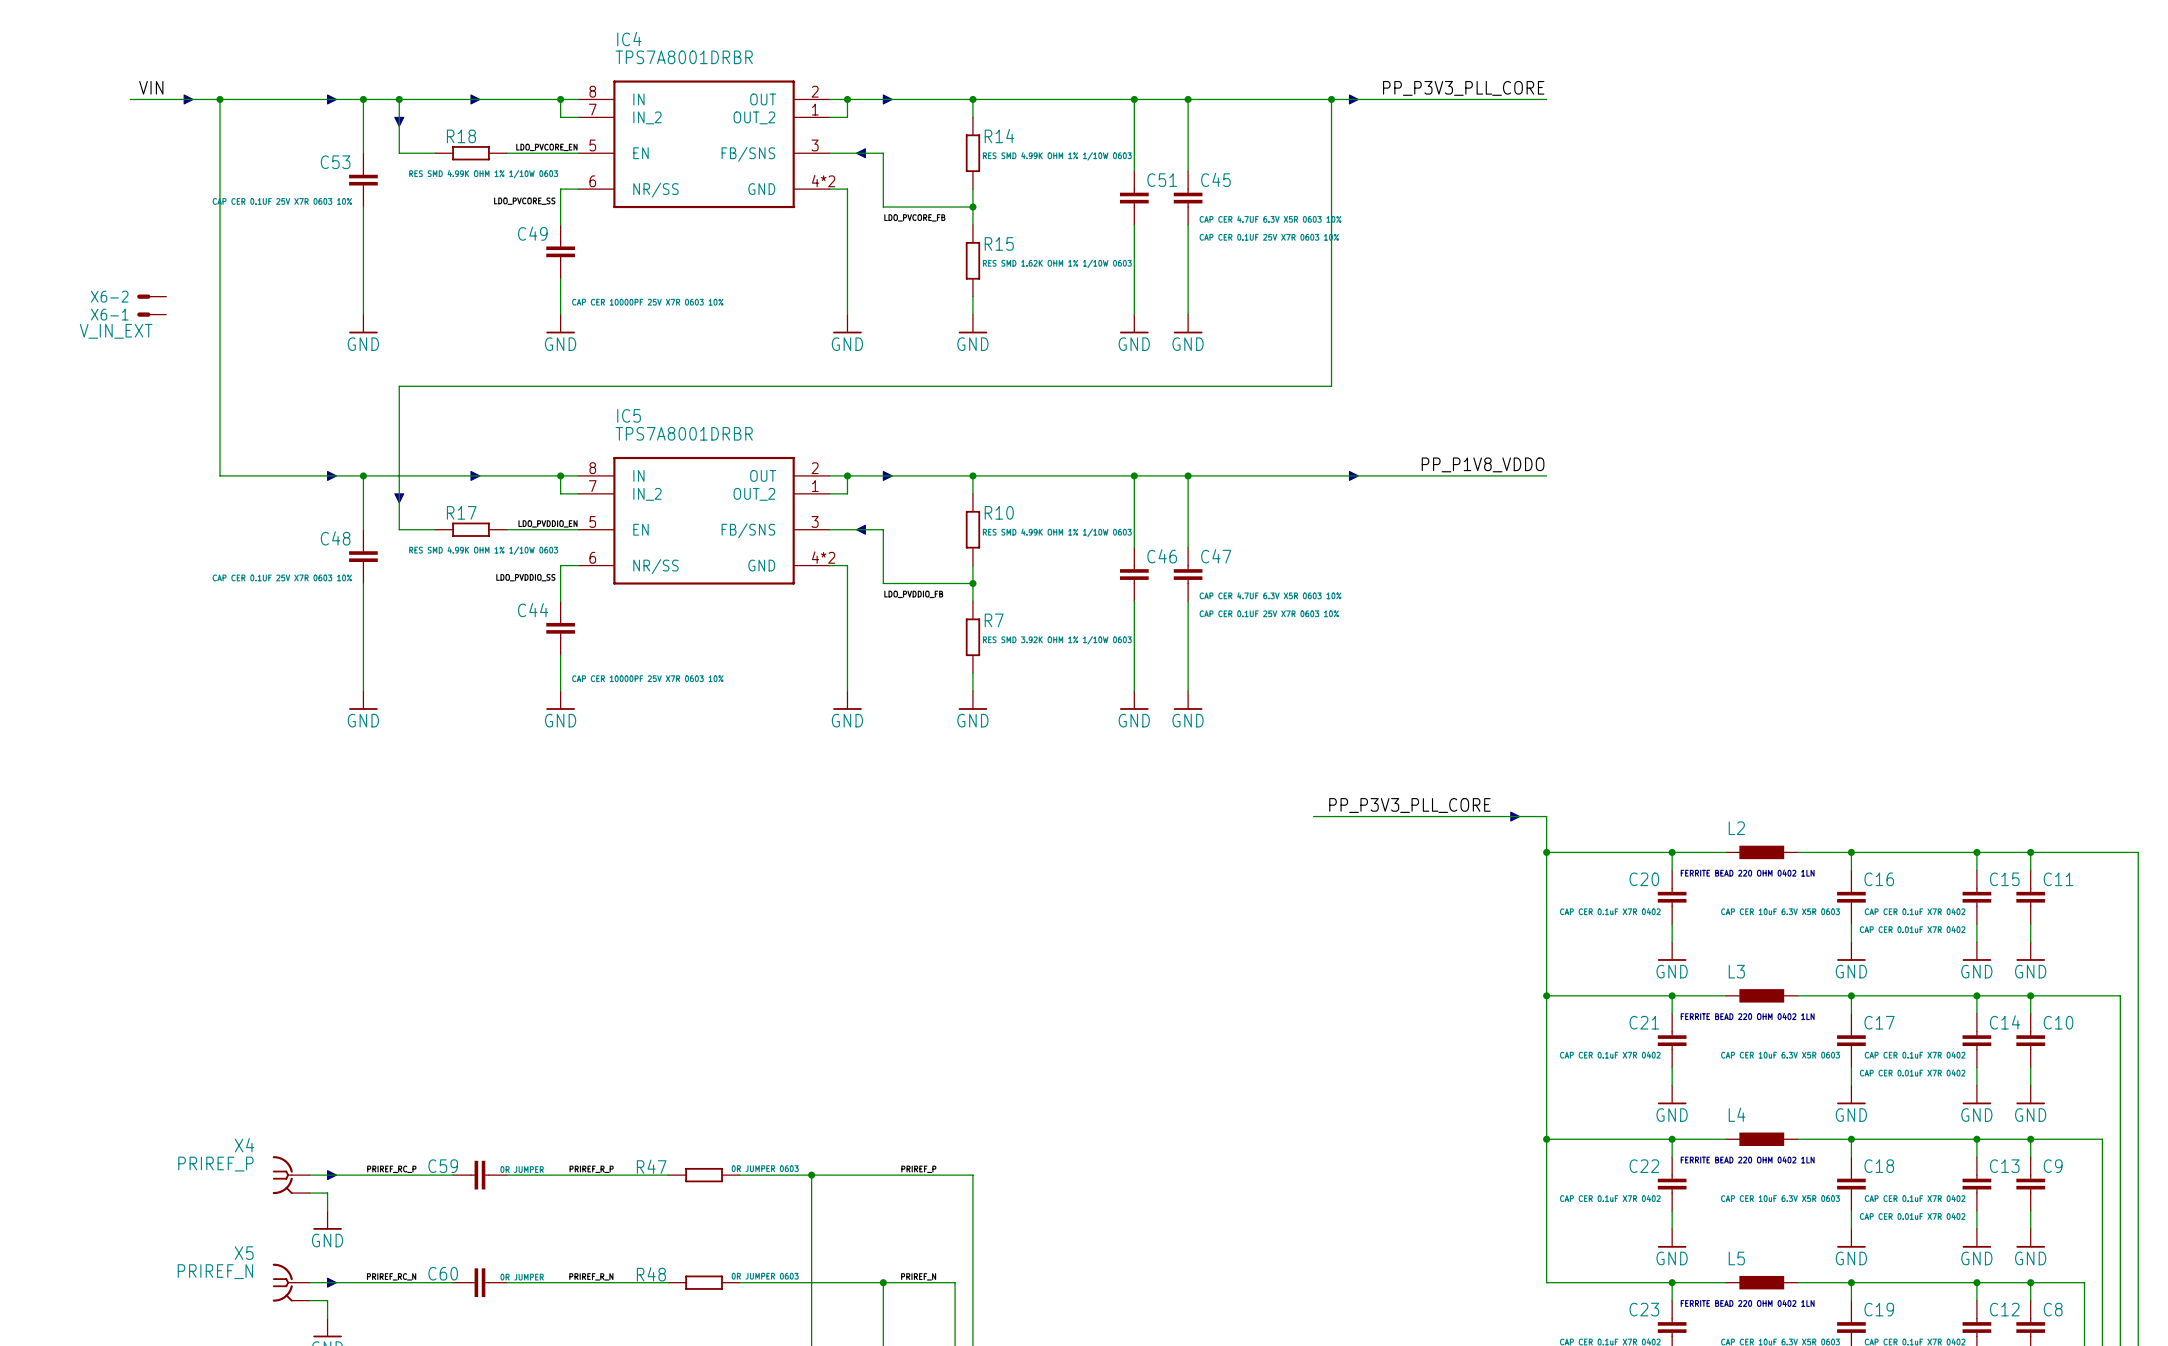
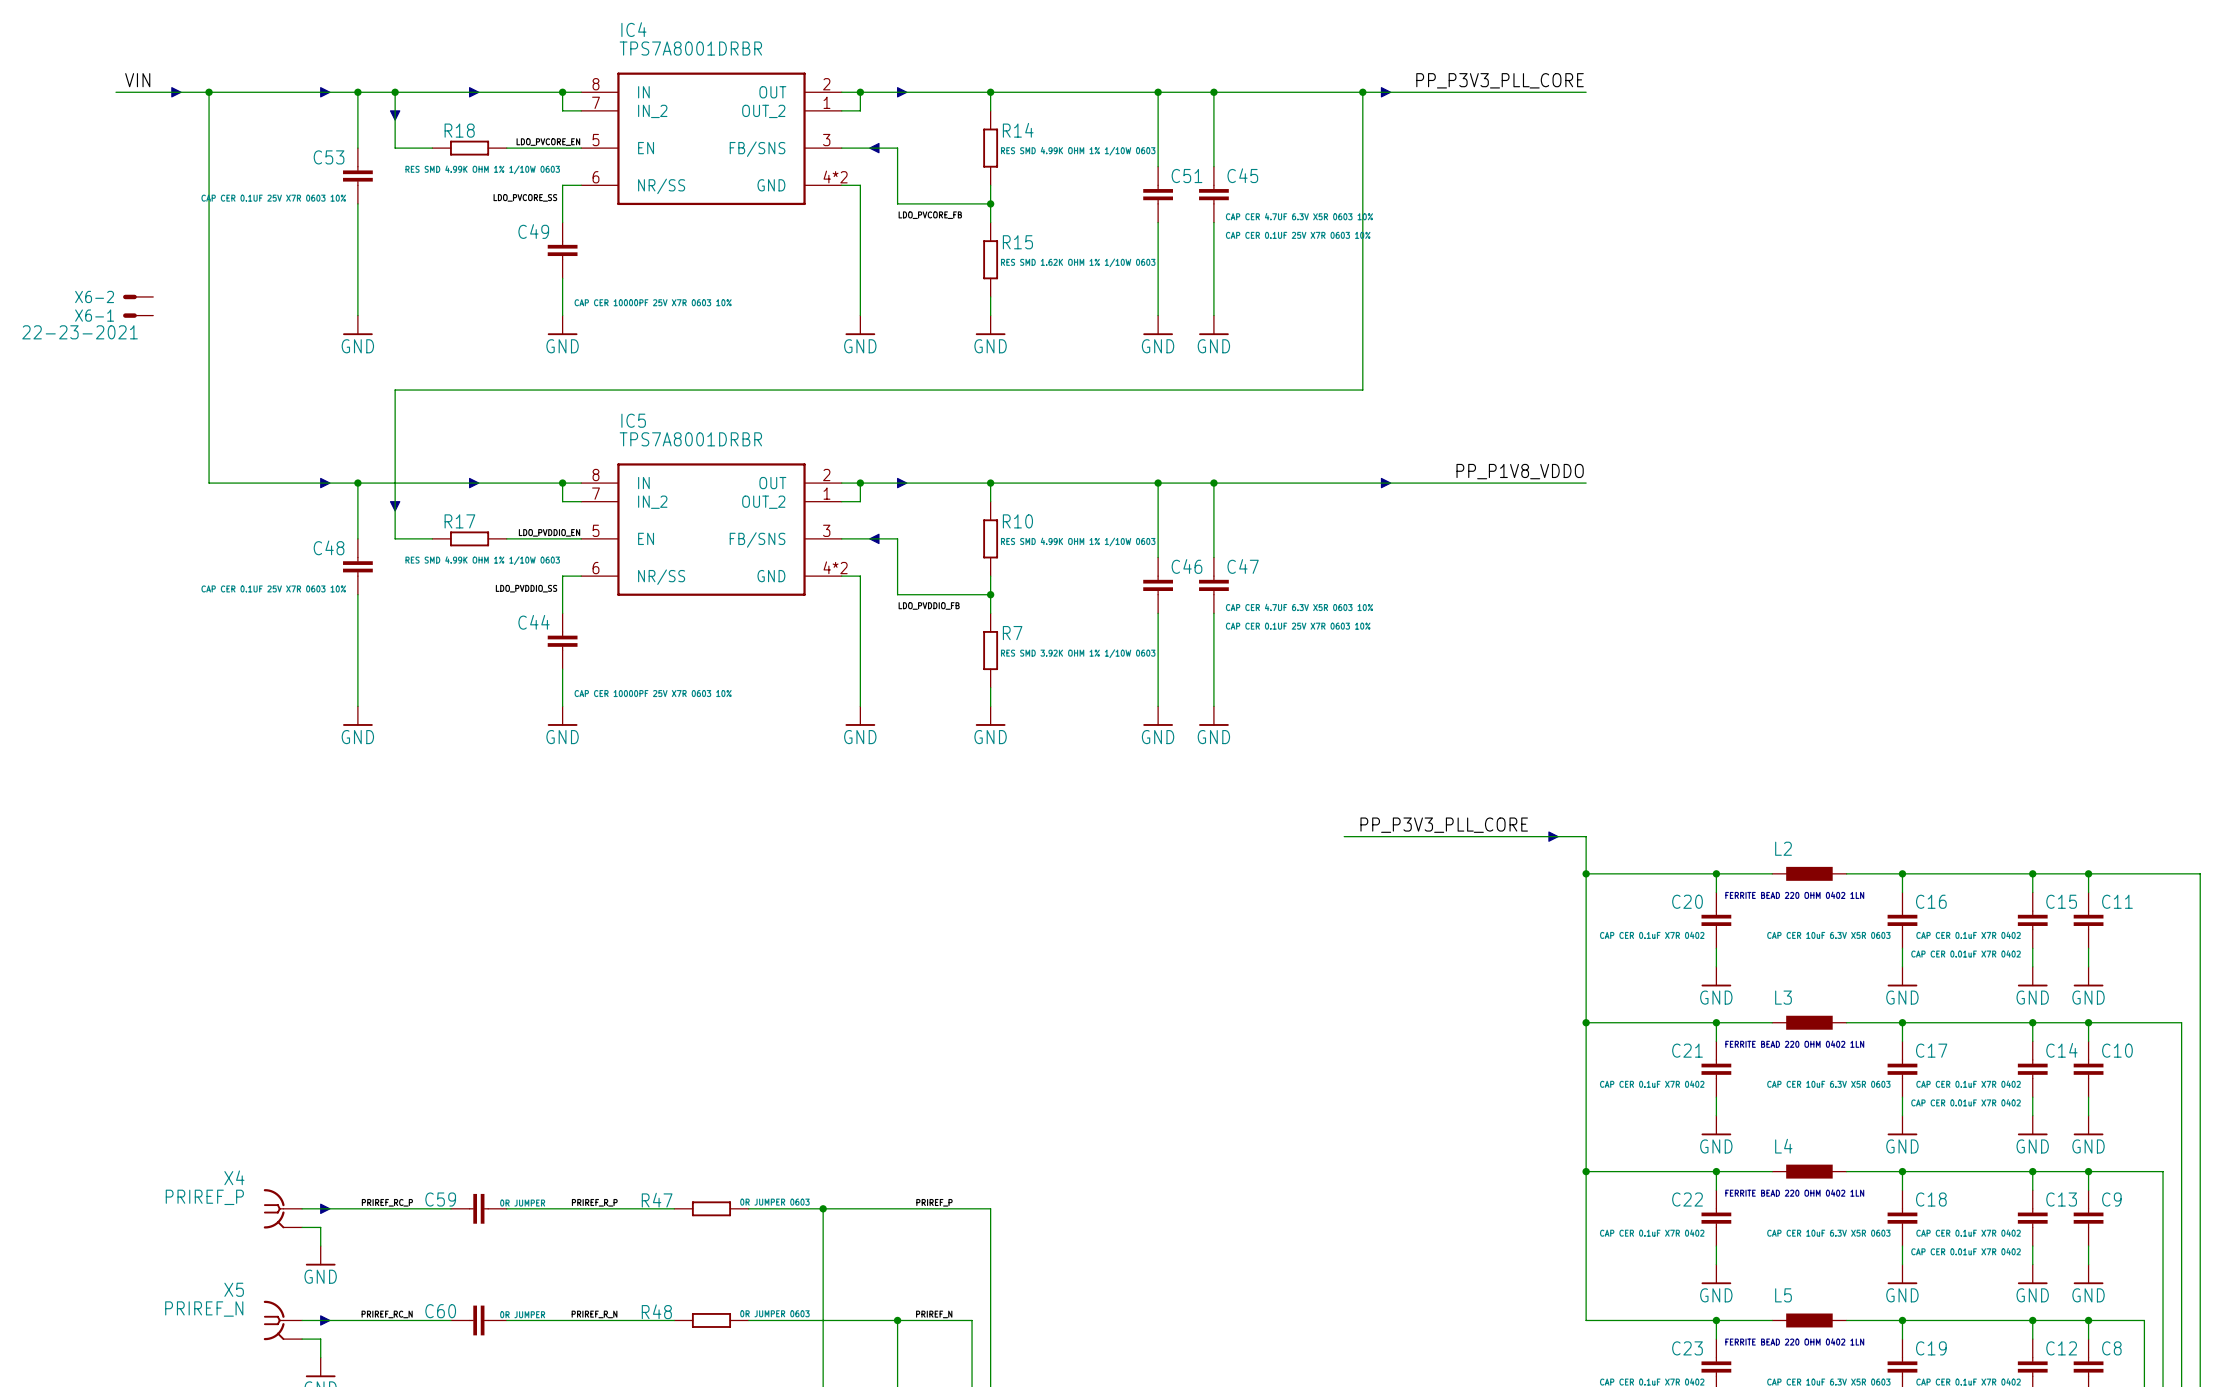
X6-1 value: V_IN_EXT (116, 331) -> 22-23-2021 (80, 332)

